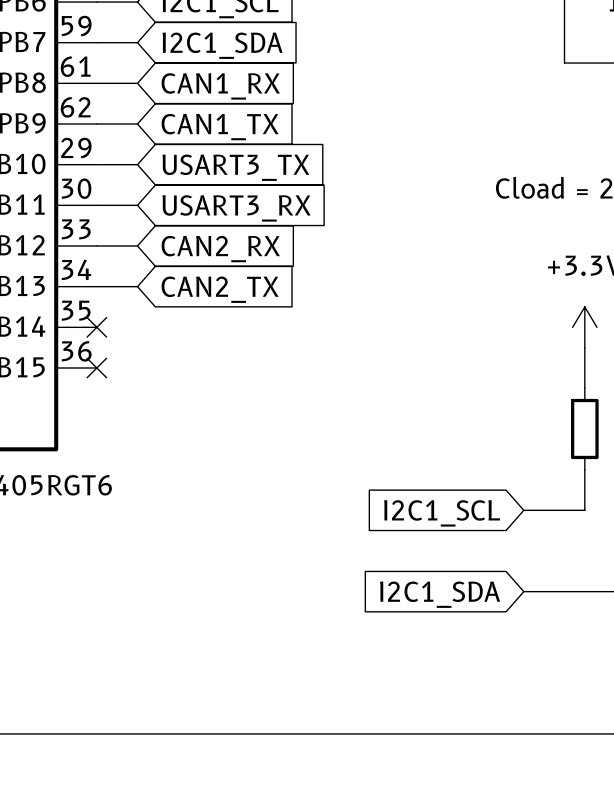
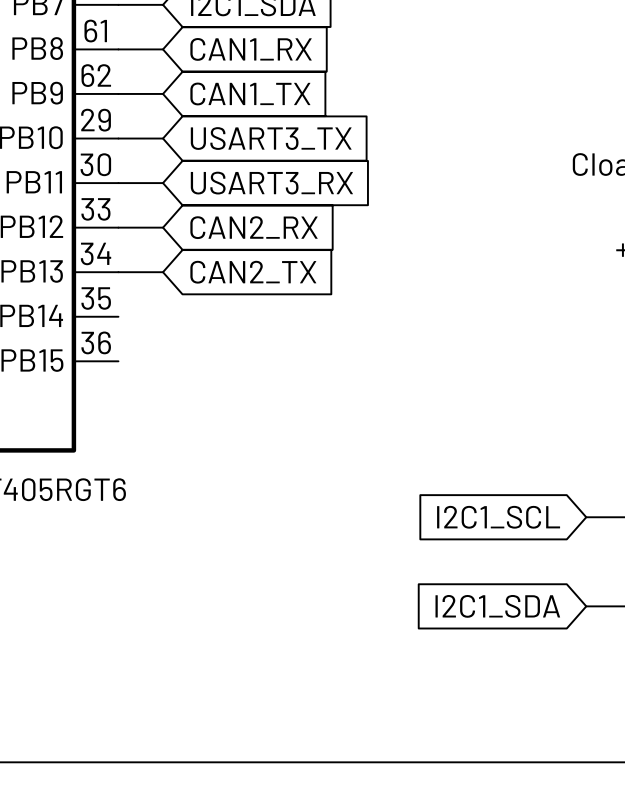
no-connect mark: (96, 327) -> none
no-connect mark: (96, 367) -> none

